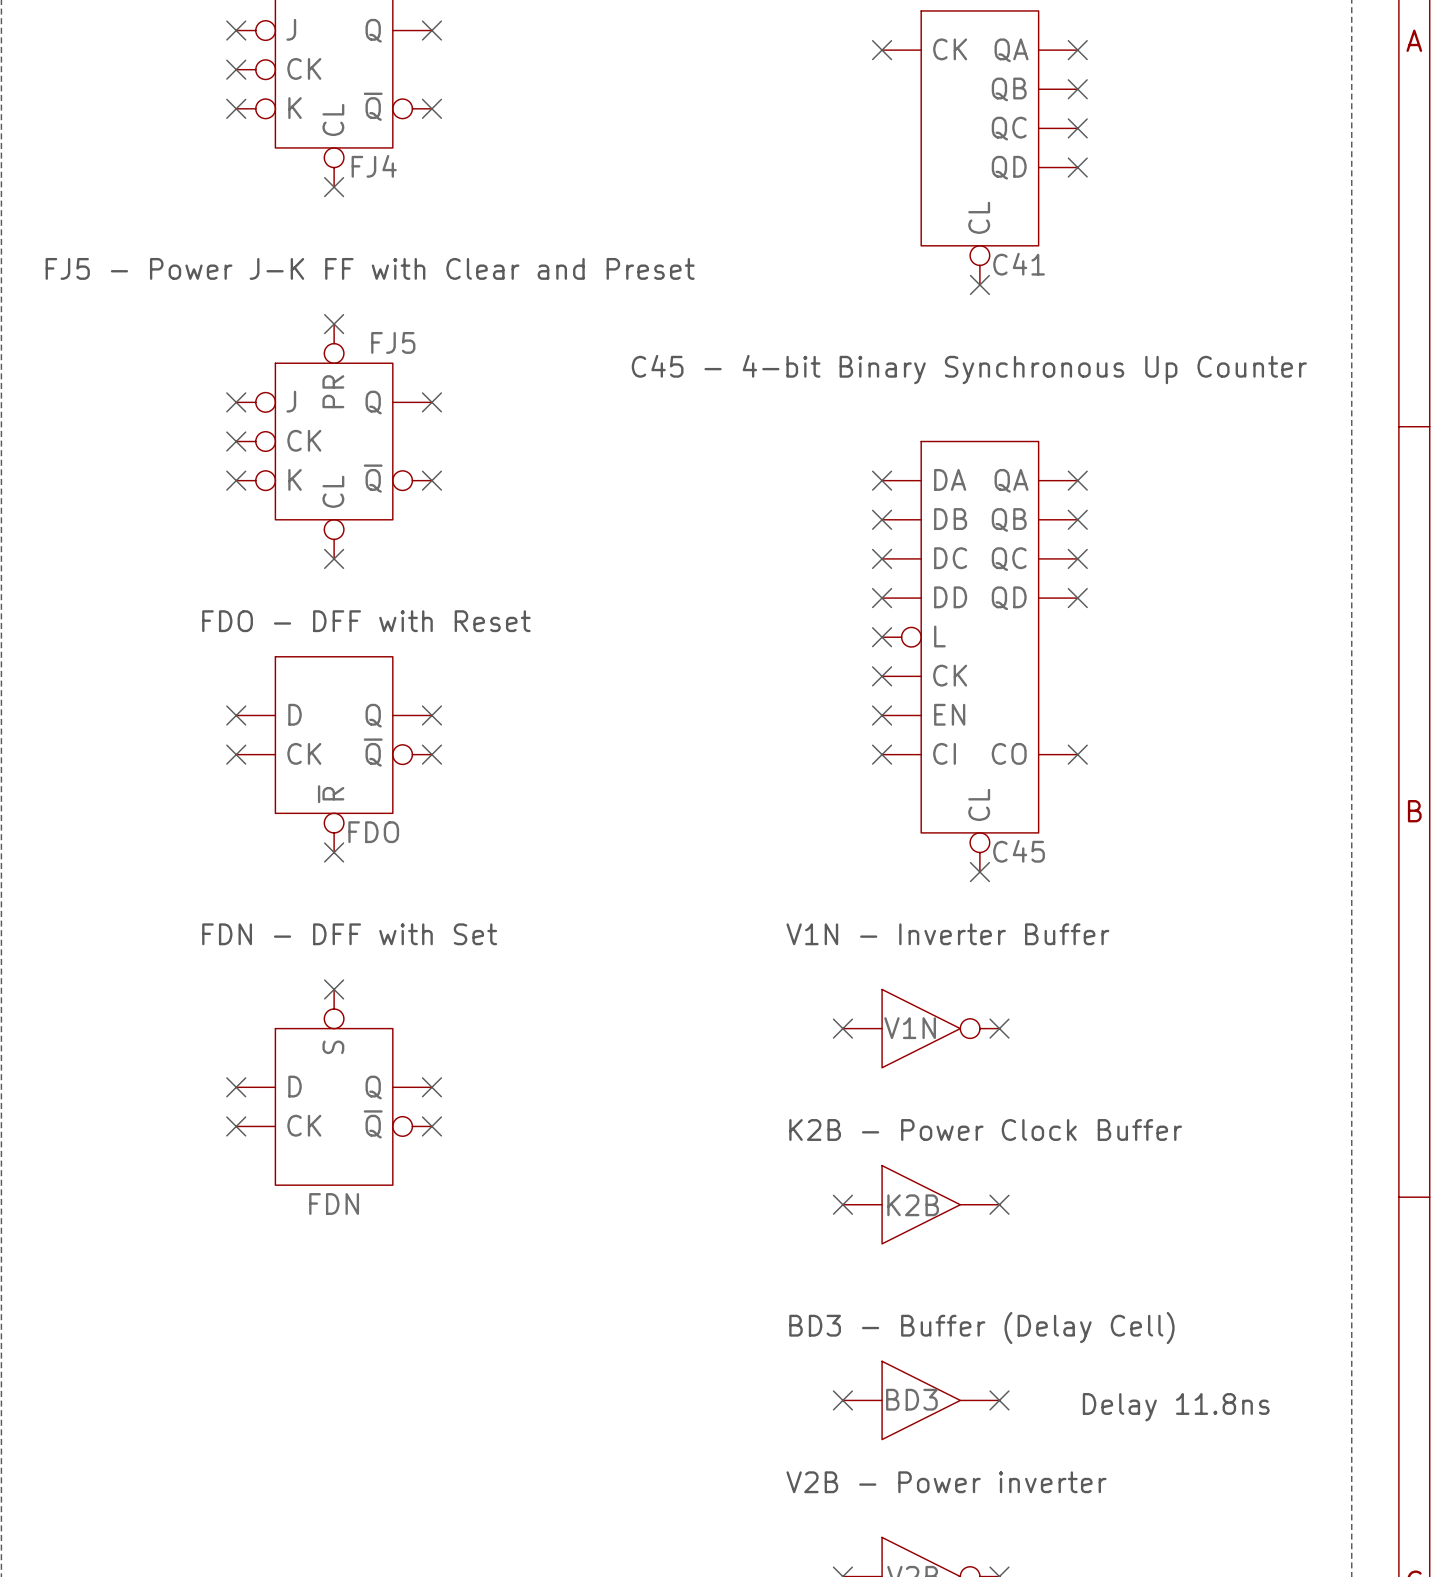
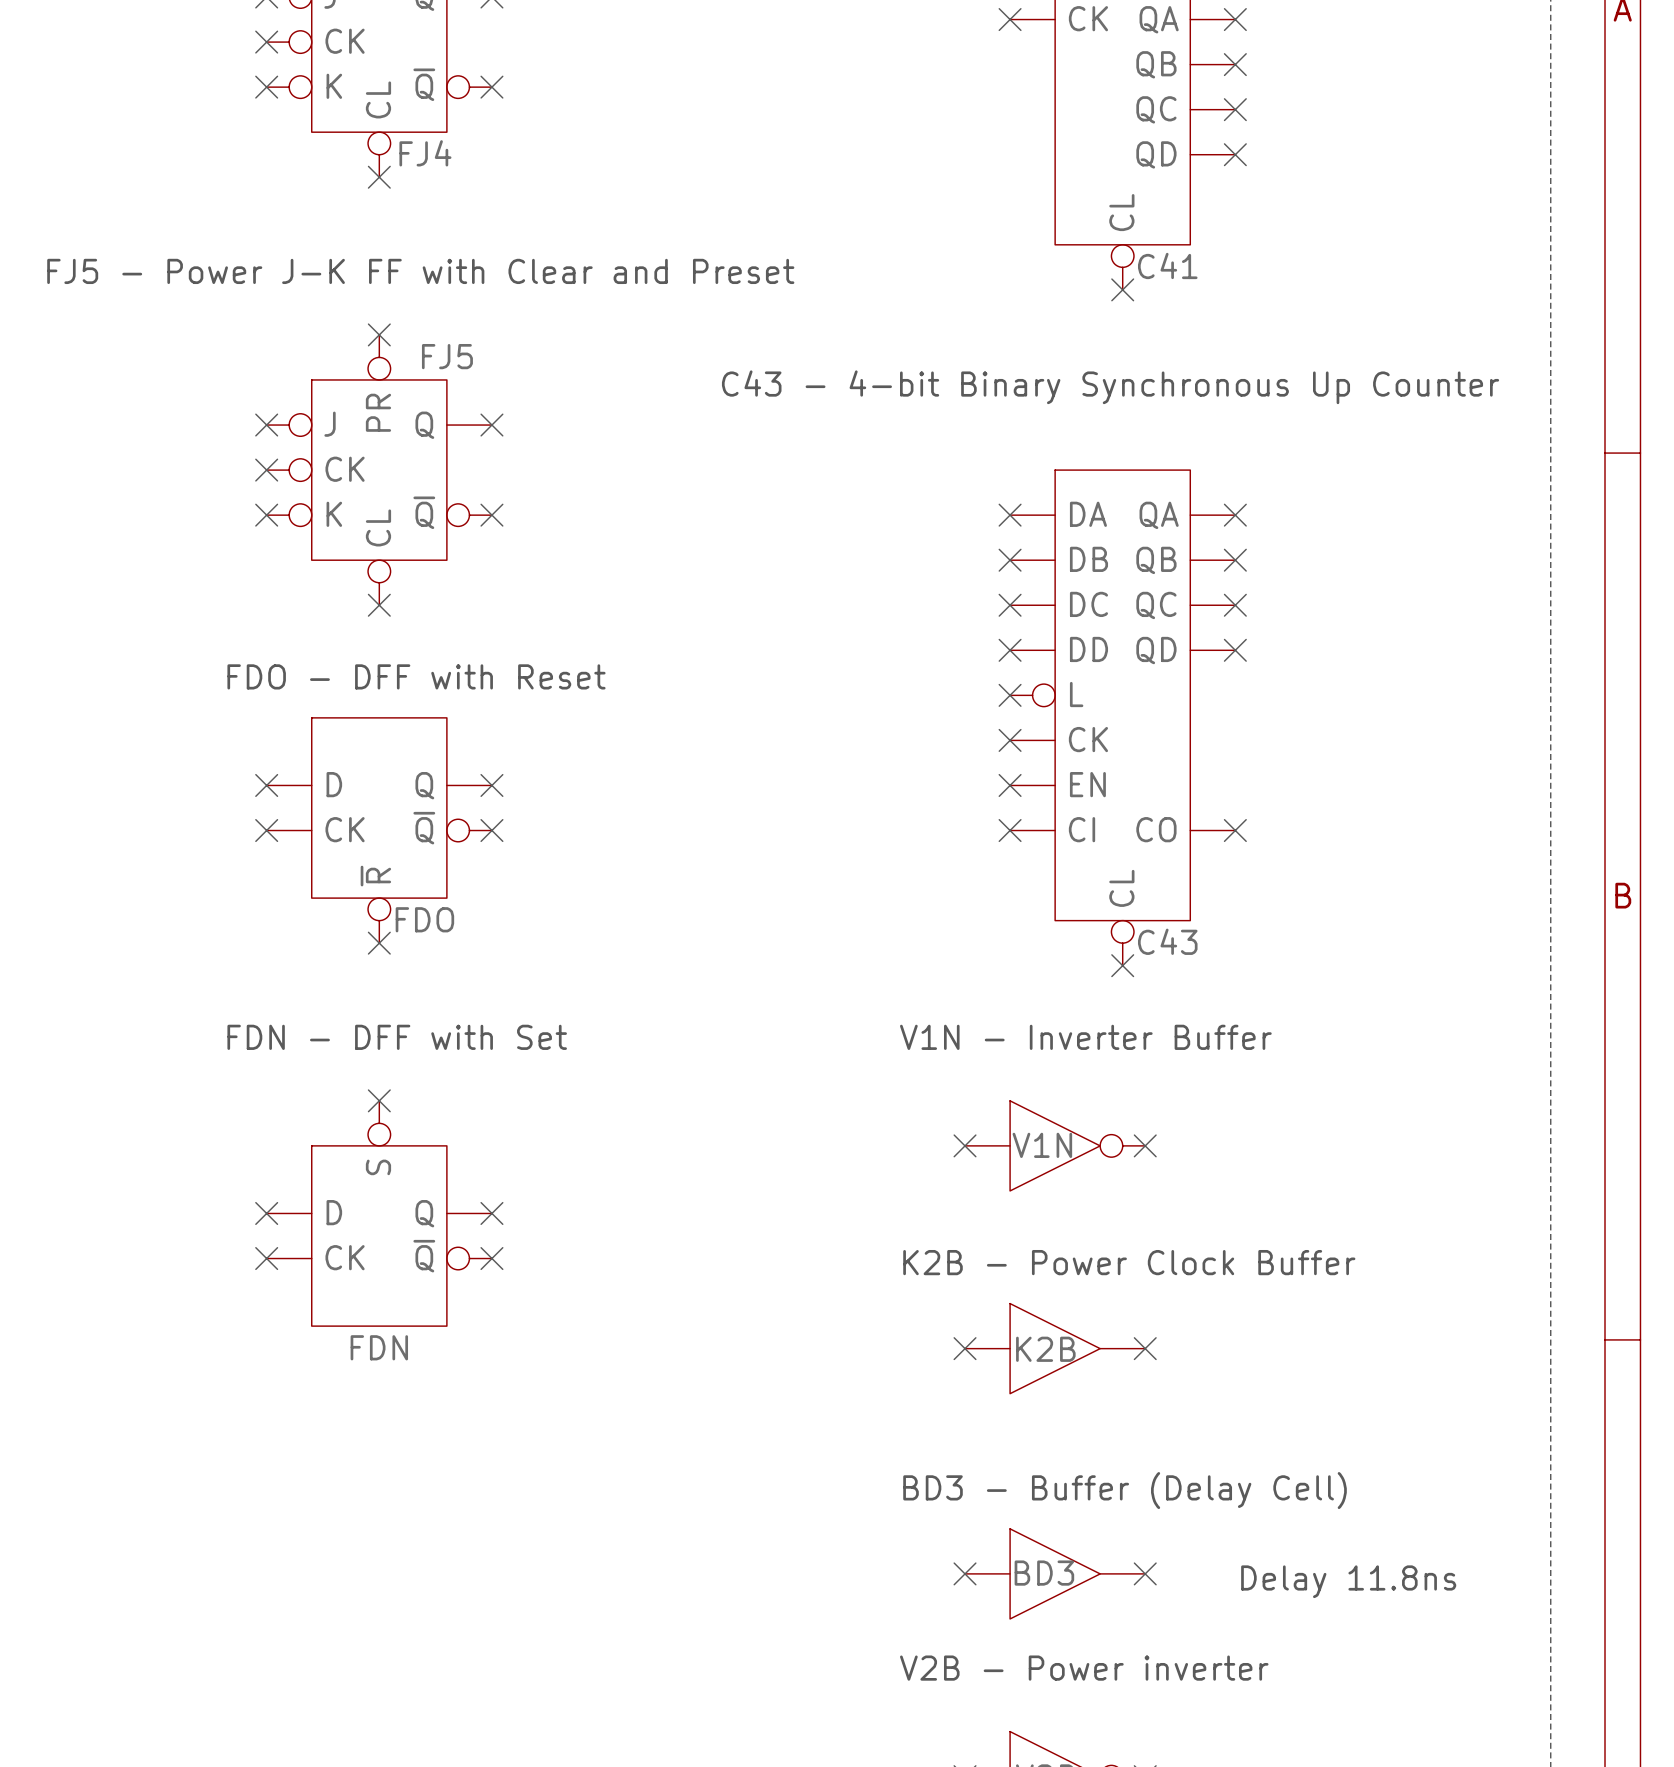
text: C45 - 4-bit Binary Synchronous Up Counter (969, 369) -> C43 - 4-bit Binary Synchronous Up Counter (1110, 387)
part value: C45 (1019, 851) -> C43 (1167, 941)

